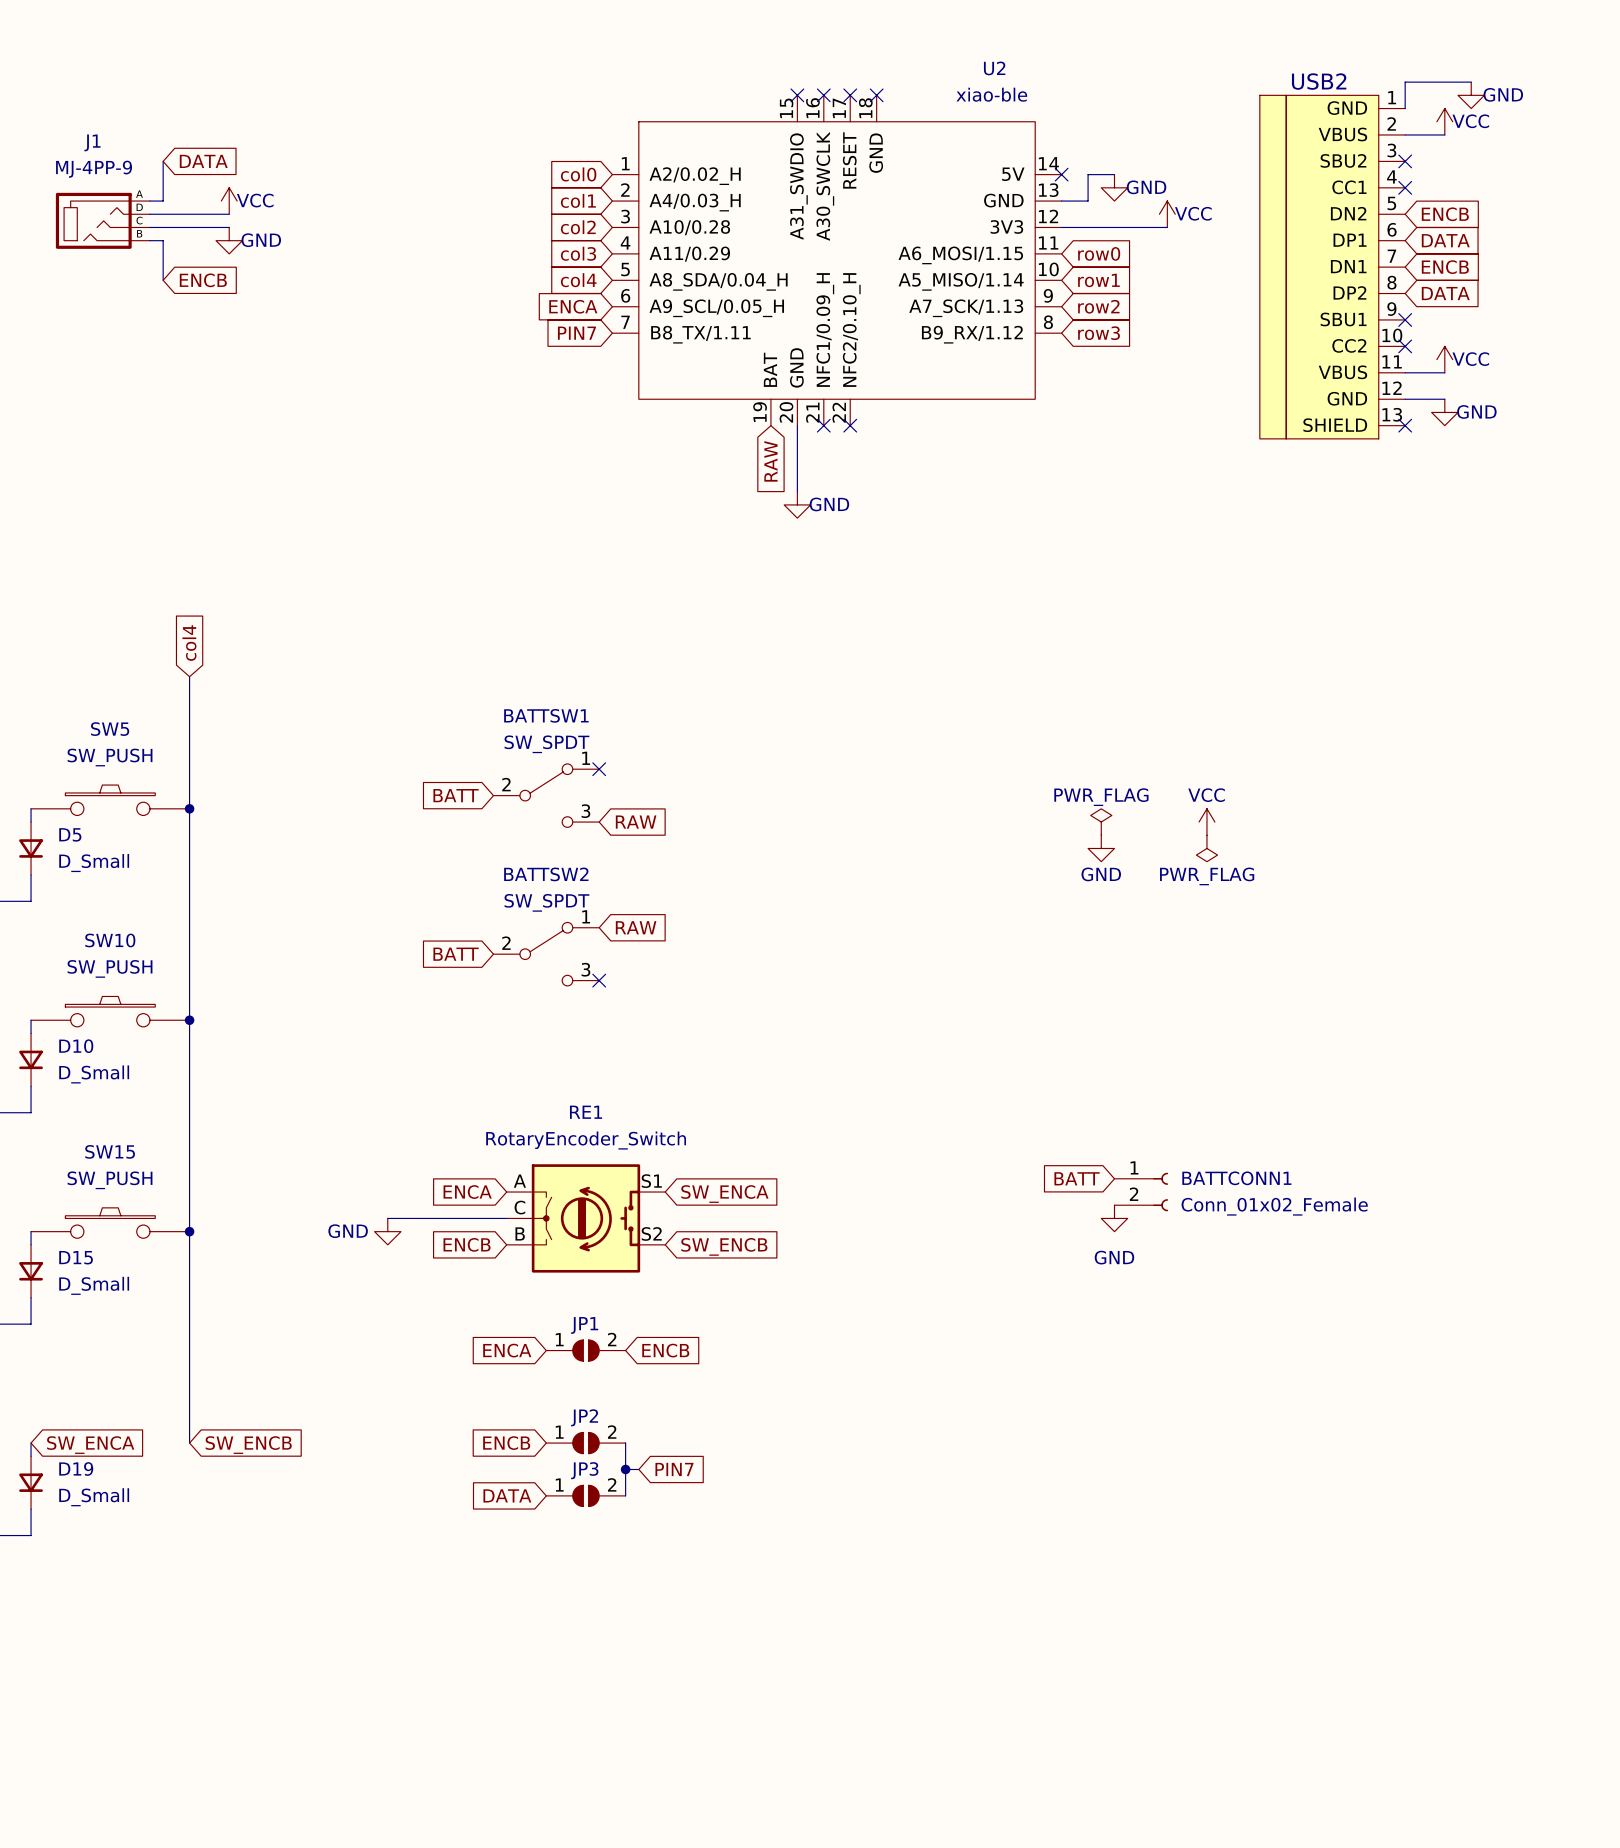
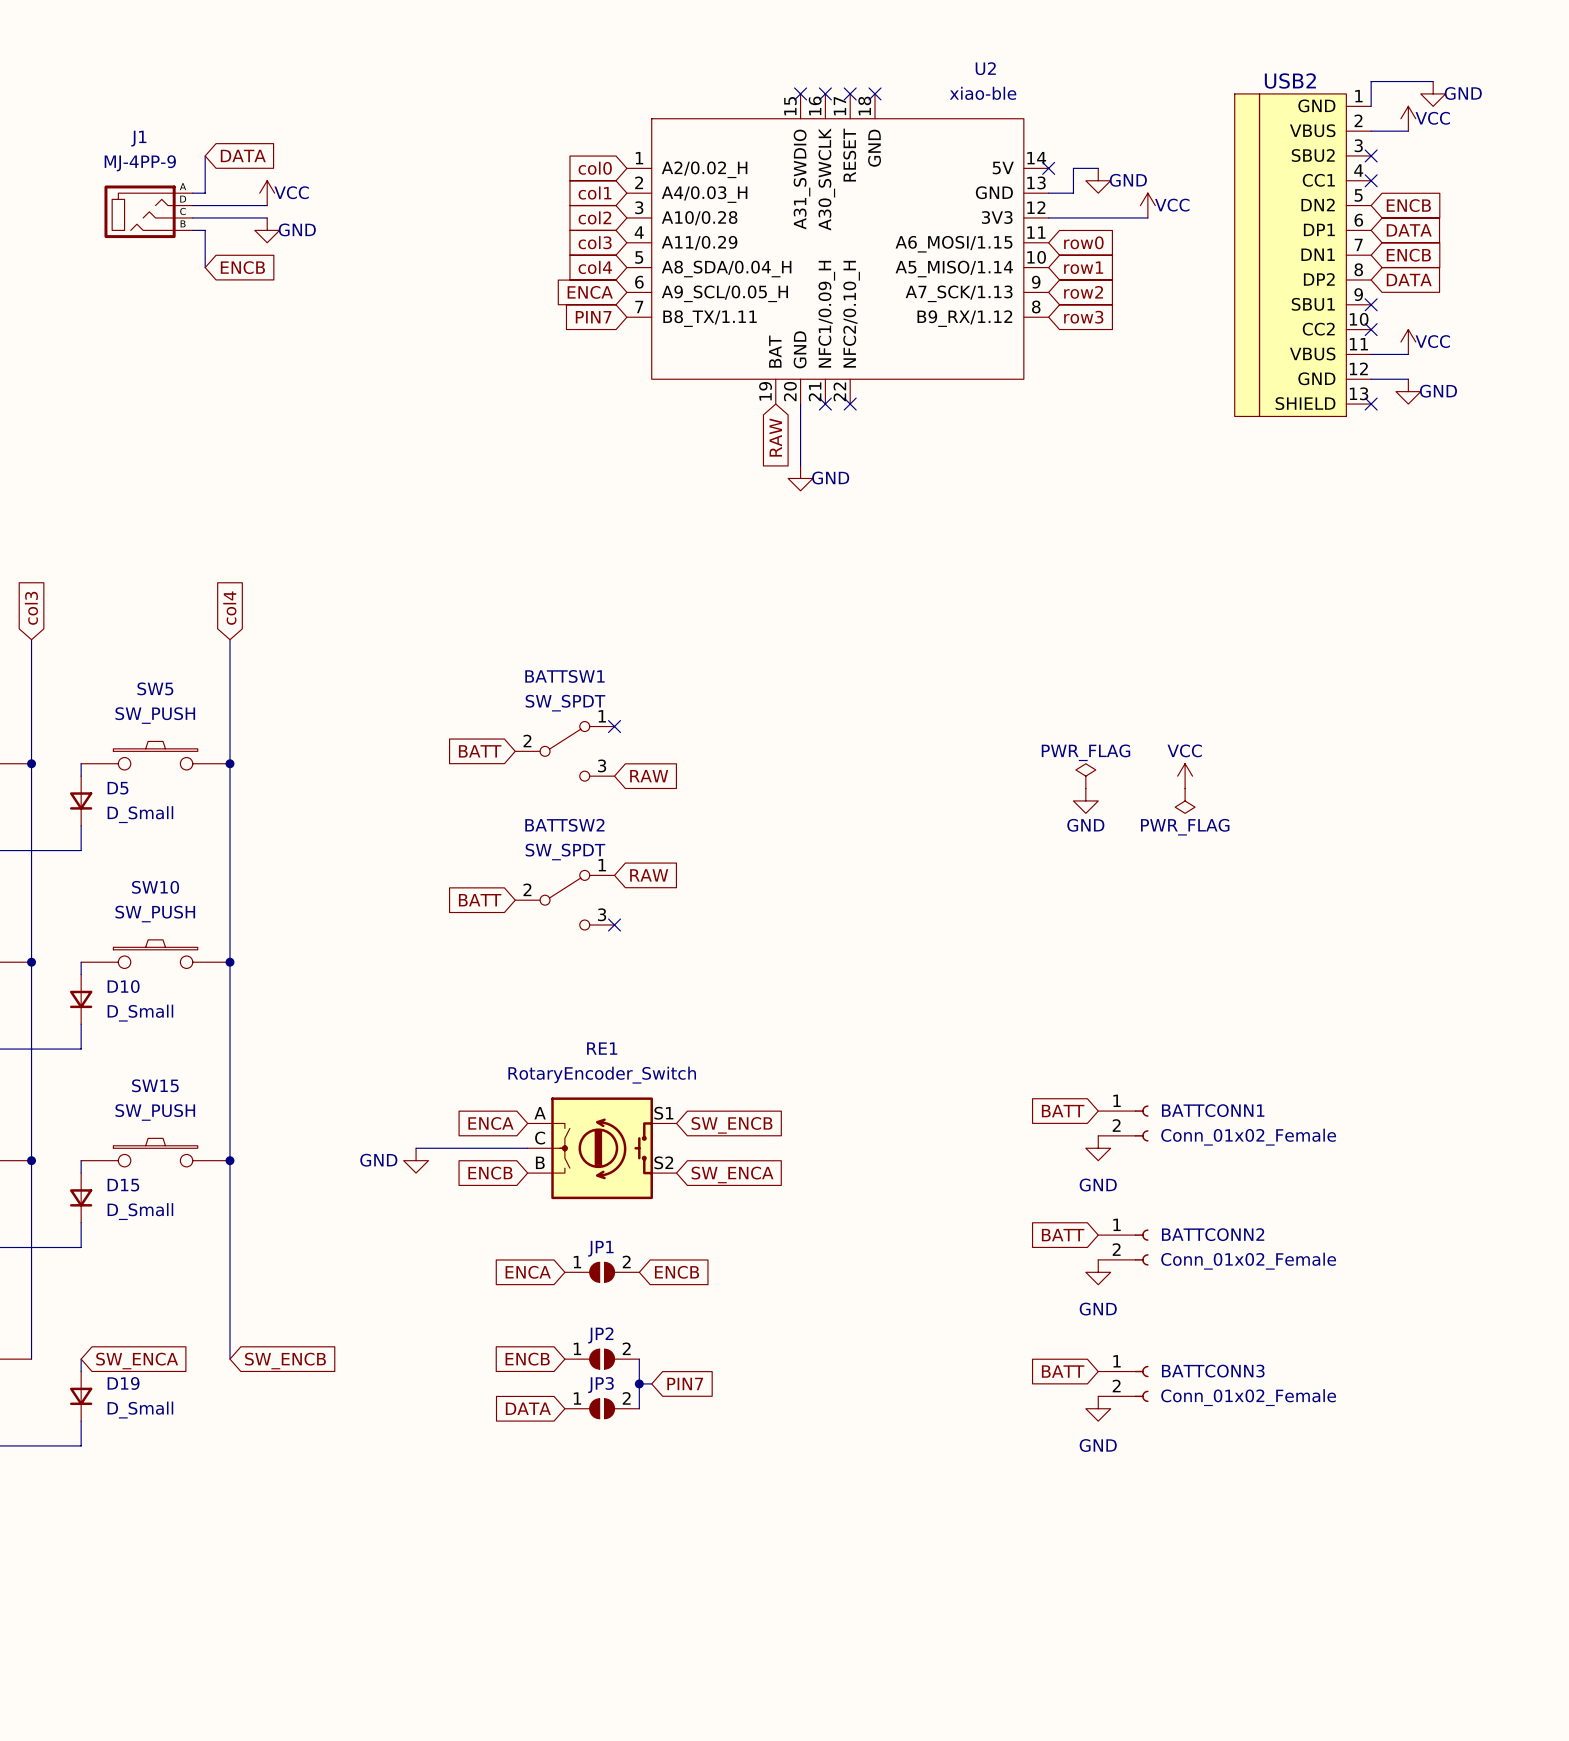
global label: SW_ENCA (724, 1194) -> SW_ENCB (732, 1125)
global label: SW_ENCB (724, 1246) -> SW_ENCA (732, 1174)
global label: none -> BATT (1063, 1235)
BATTCONN2: none -> Conn_01x02_Female (1123, 1247)
power symbol: none -> GND (1098, 1272)
global label: none -> BATT (1063, 1371)
BATTCONN3: none -> Conn_01x02_Female (1123, 1383)
power symbol: none -> GND (1098, 1408)

